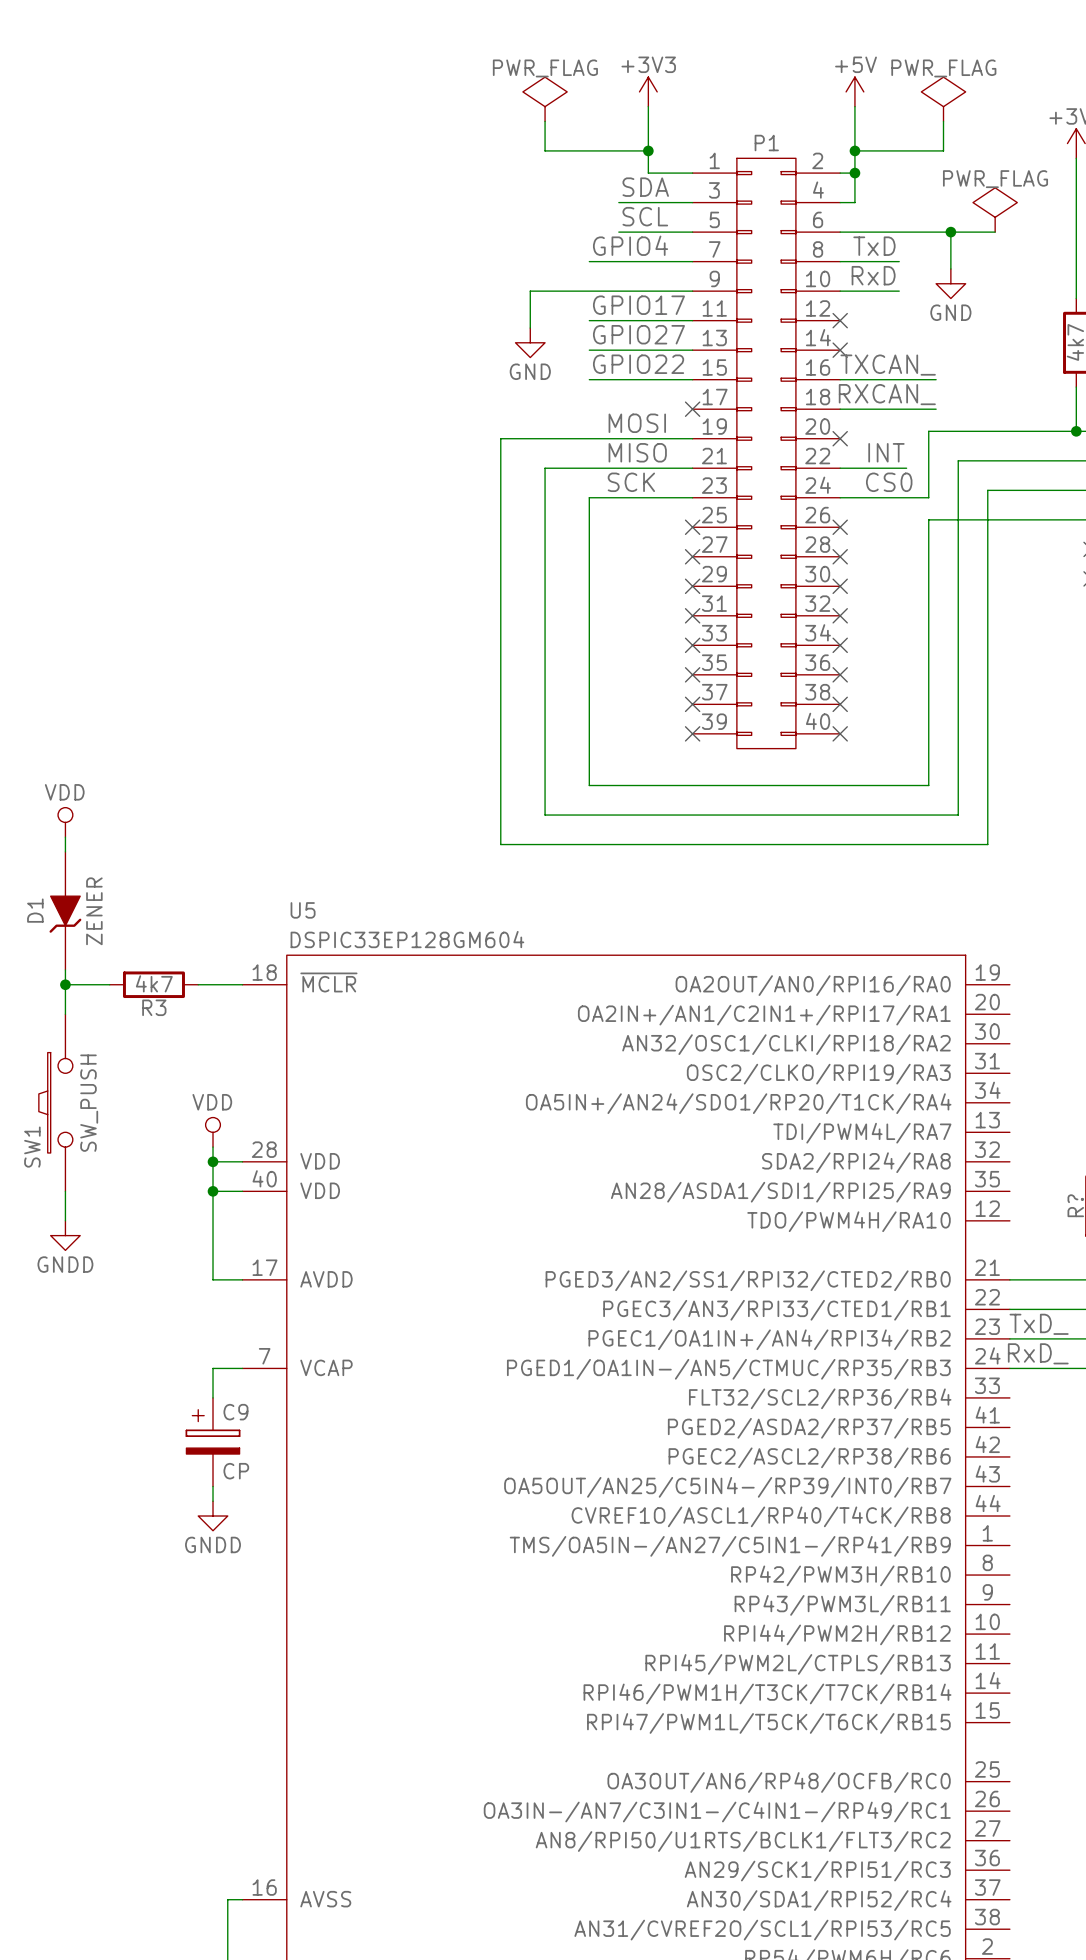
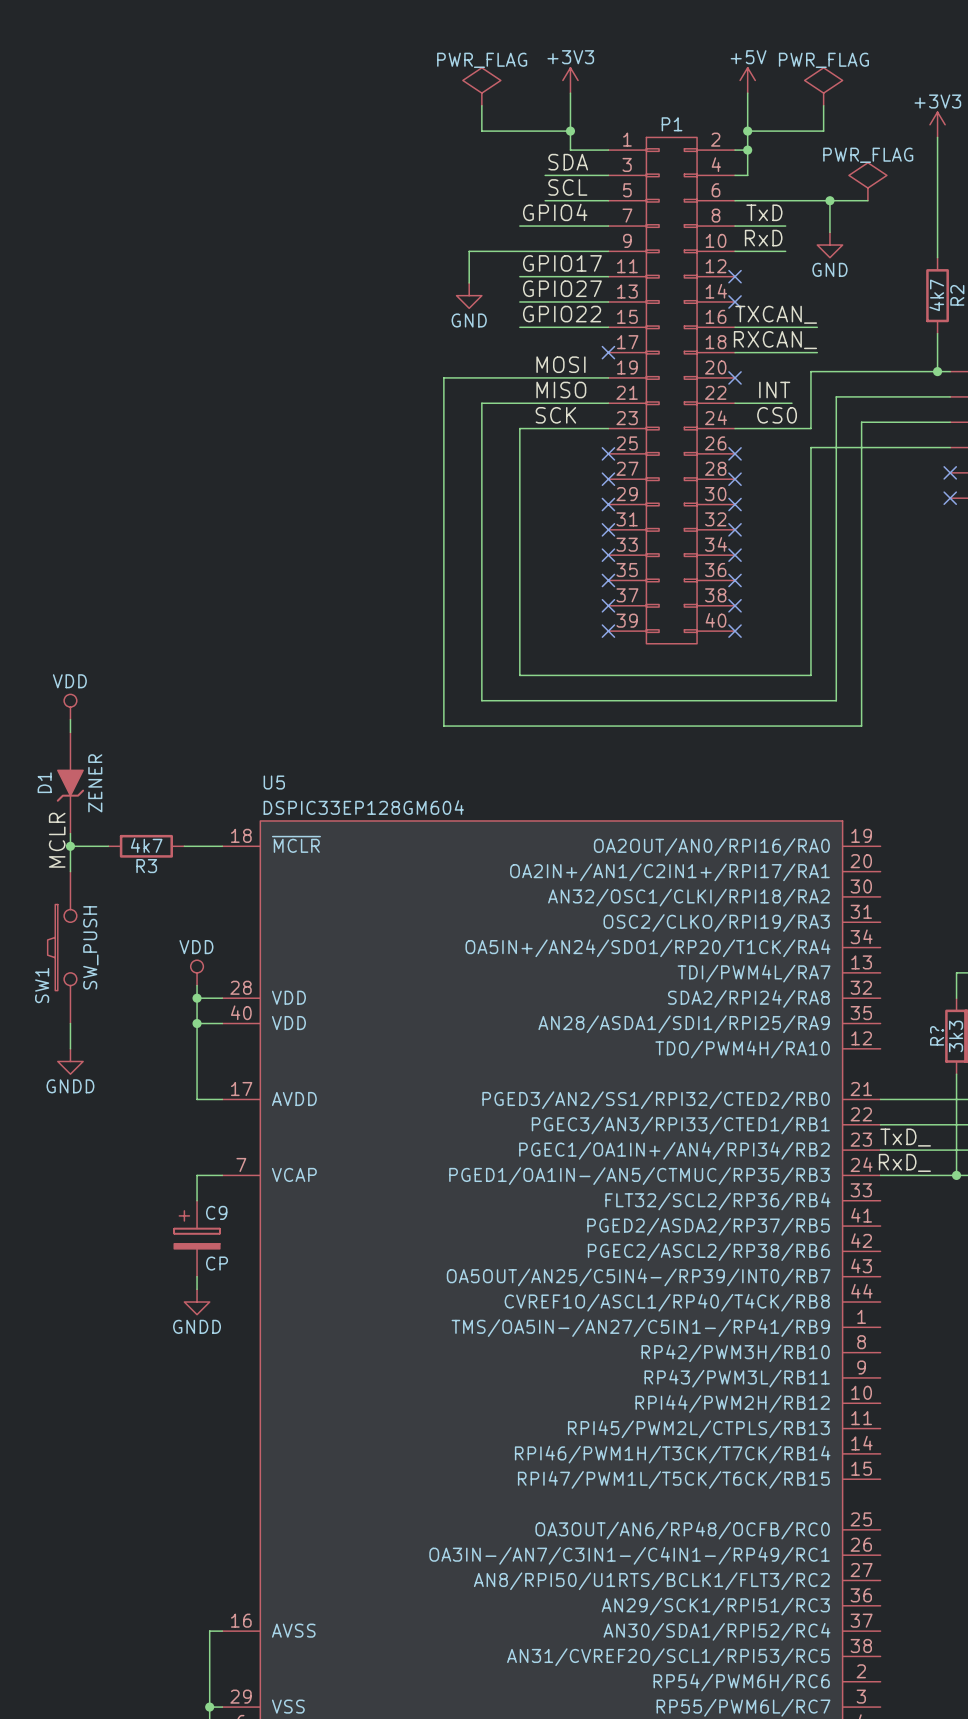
label: none -> MCLR (57, 840)

